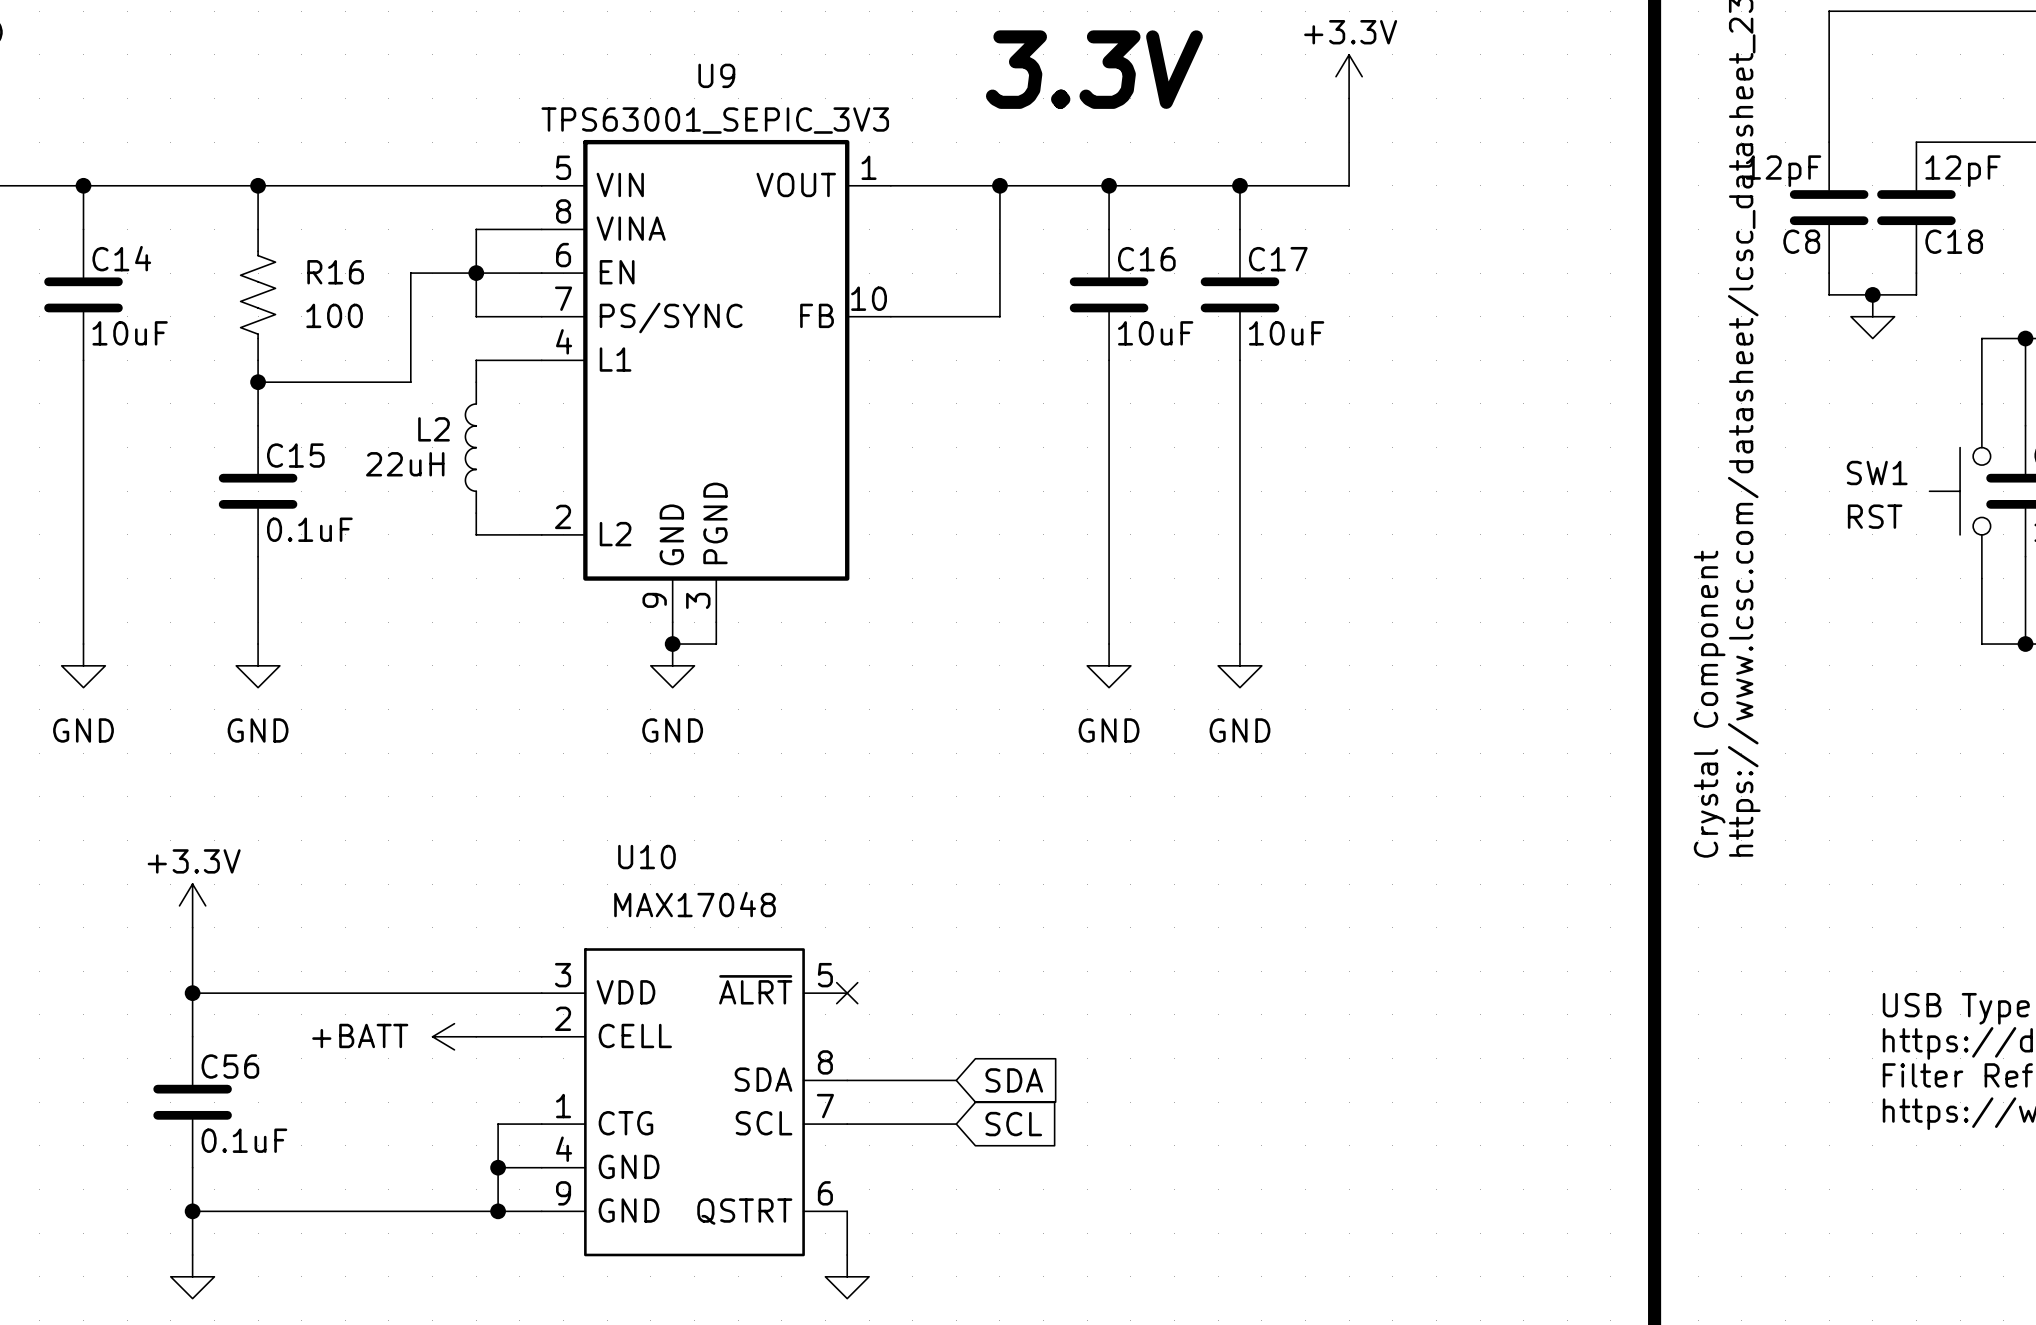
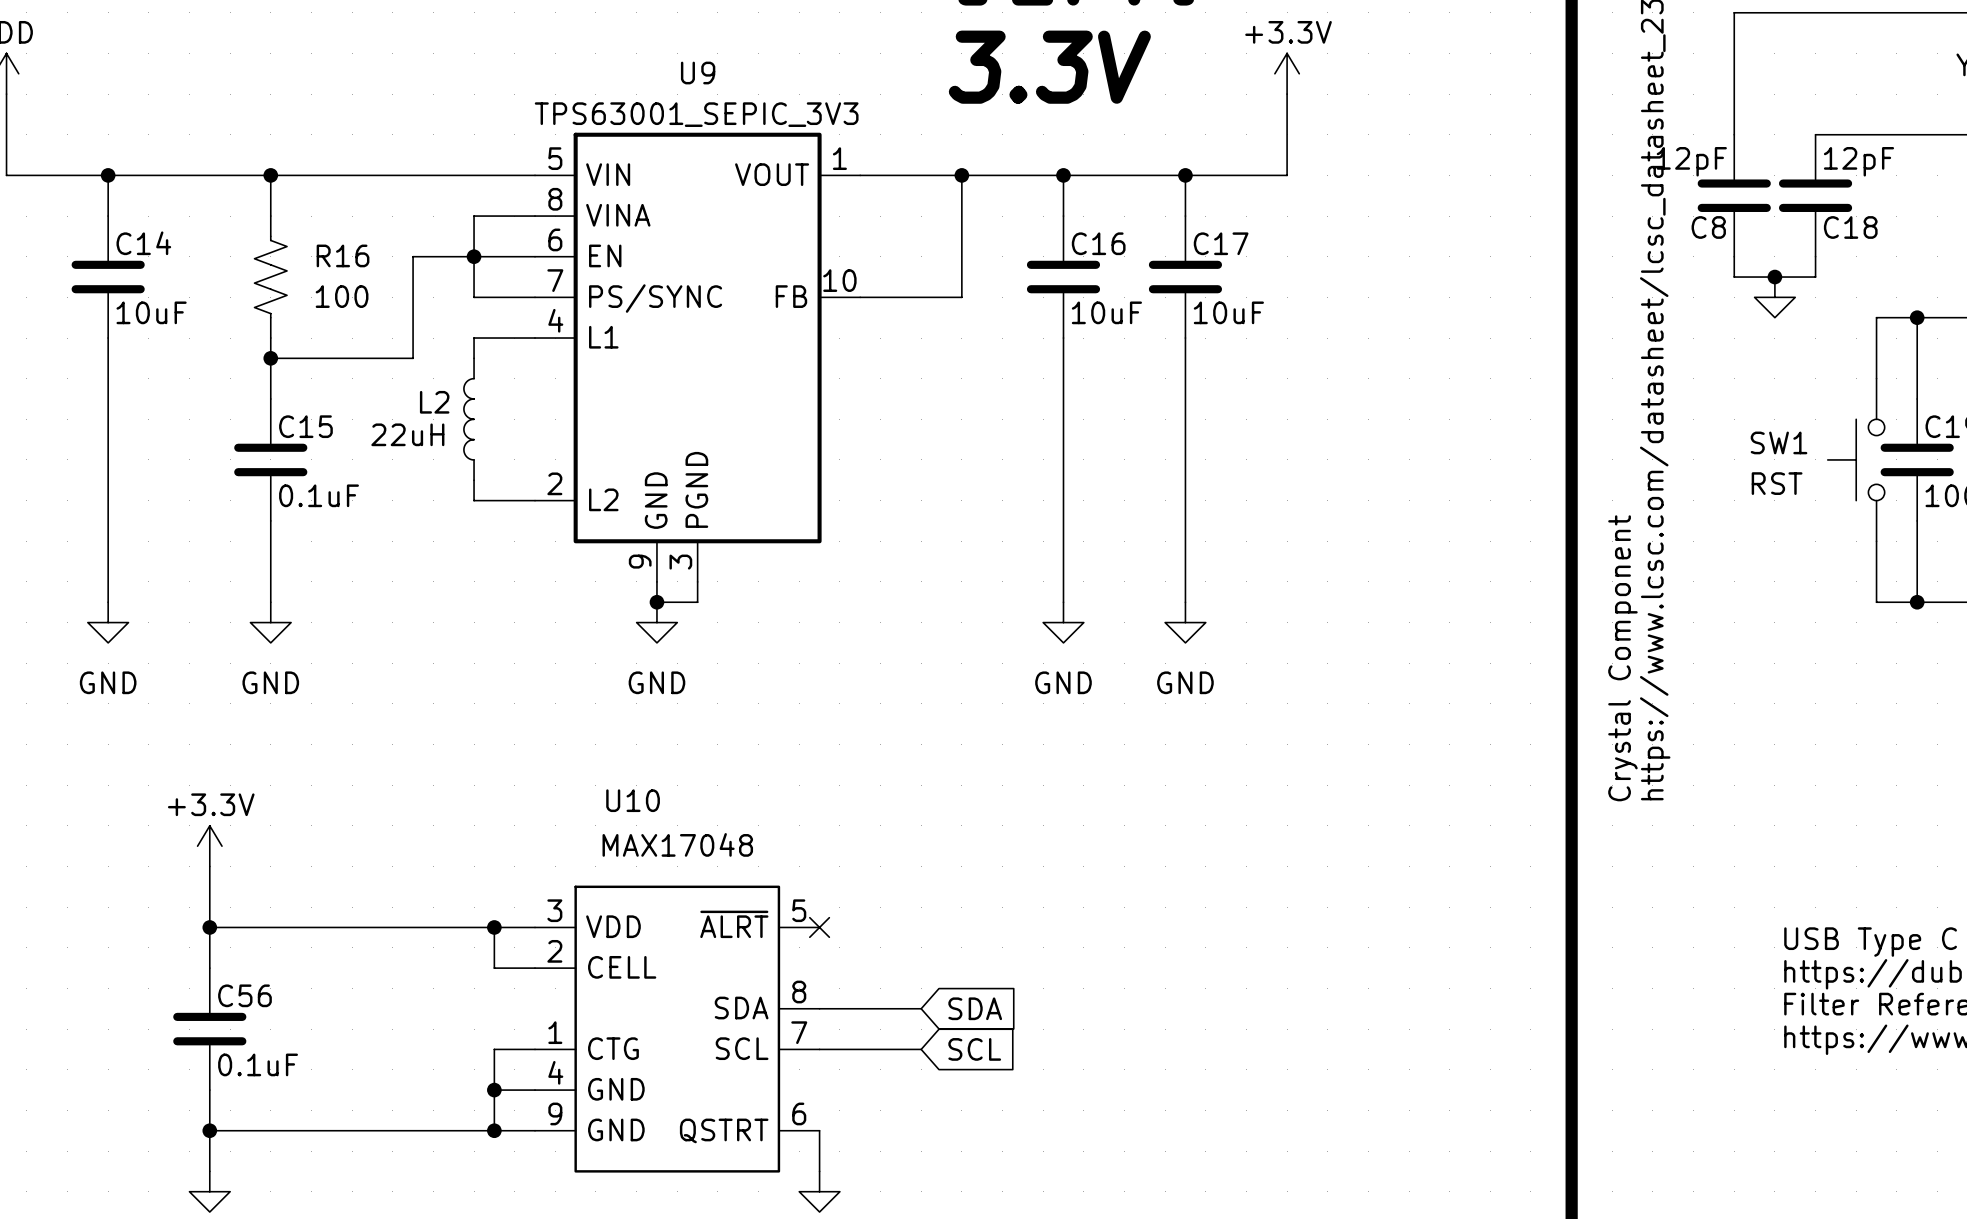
junction: none -> (494, 927)
power symbol: +BATT (454, 1036) -> none
wire: (476, 1036) (498, 1036) -> (494, 927) (494, 968)

